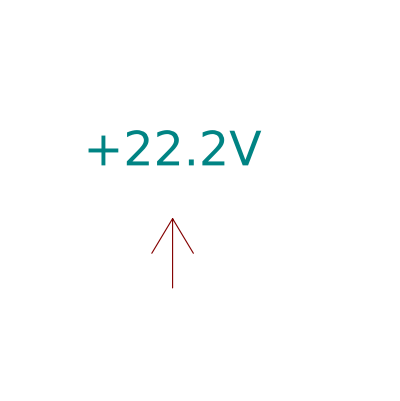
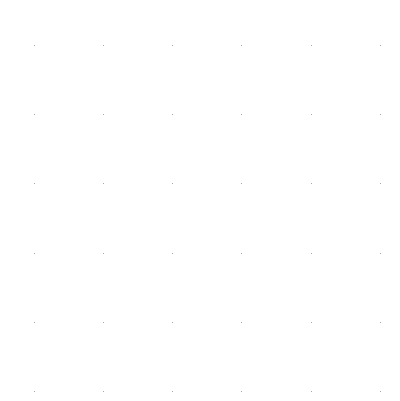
power symbol: +22.2V (172, 253) -> none

